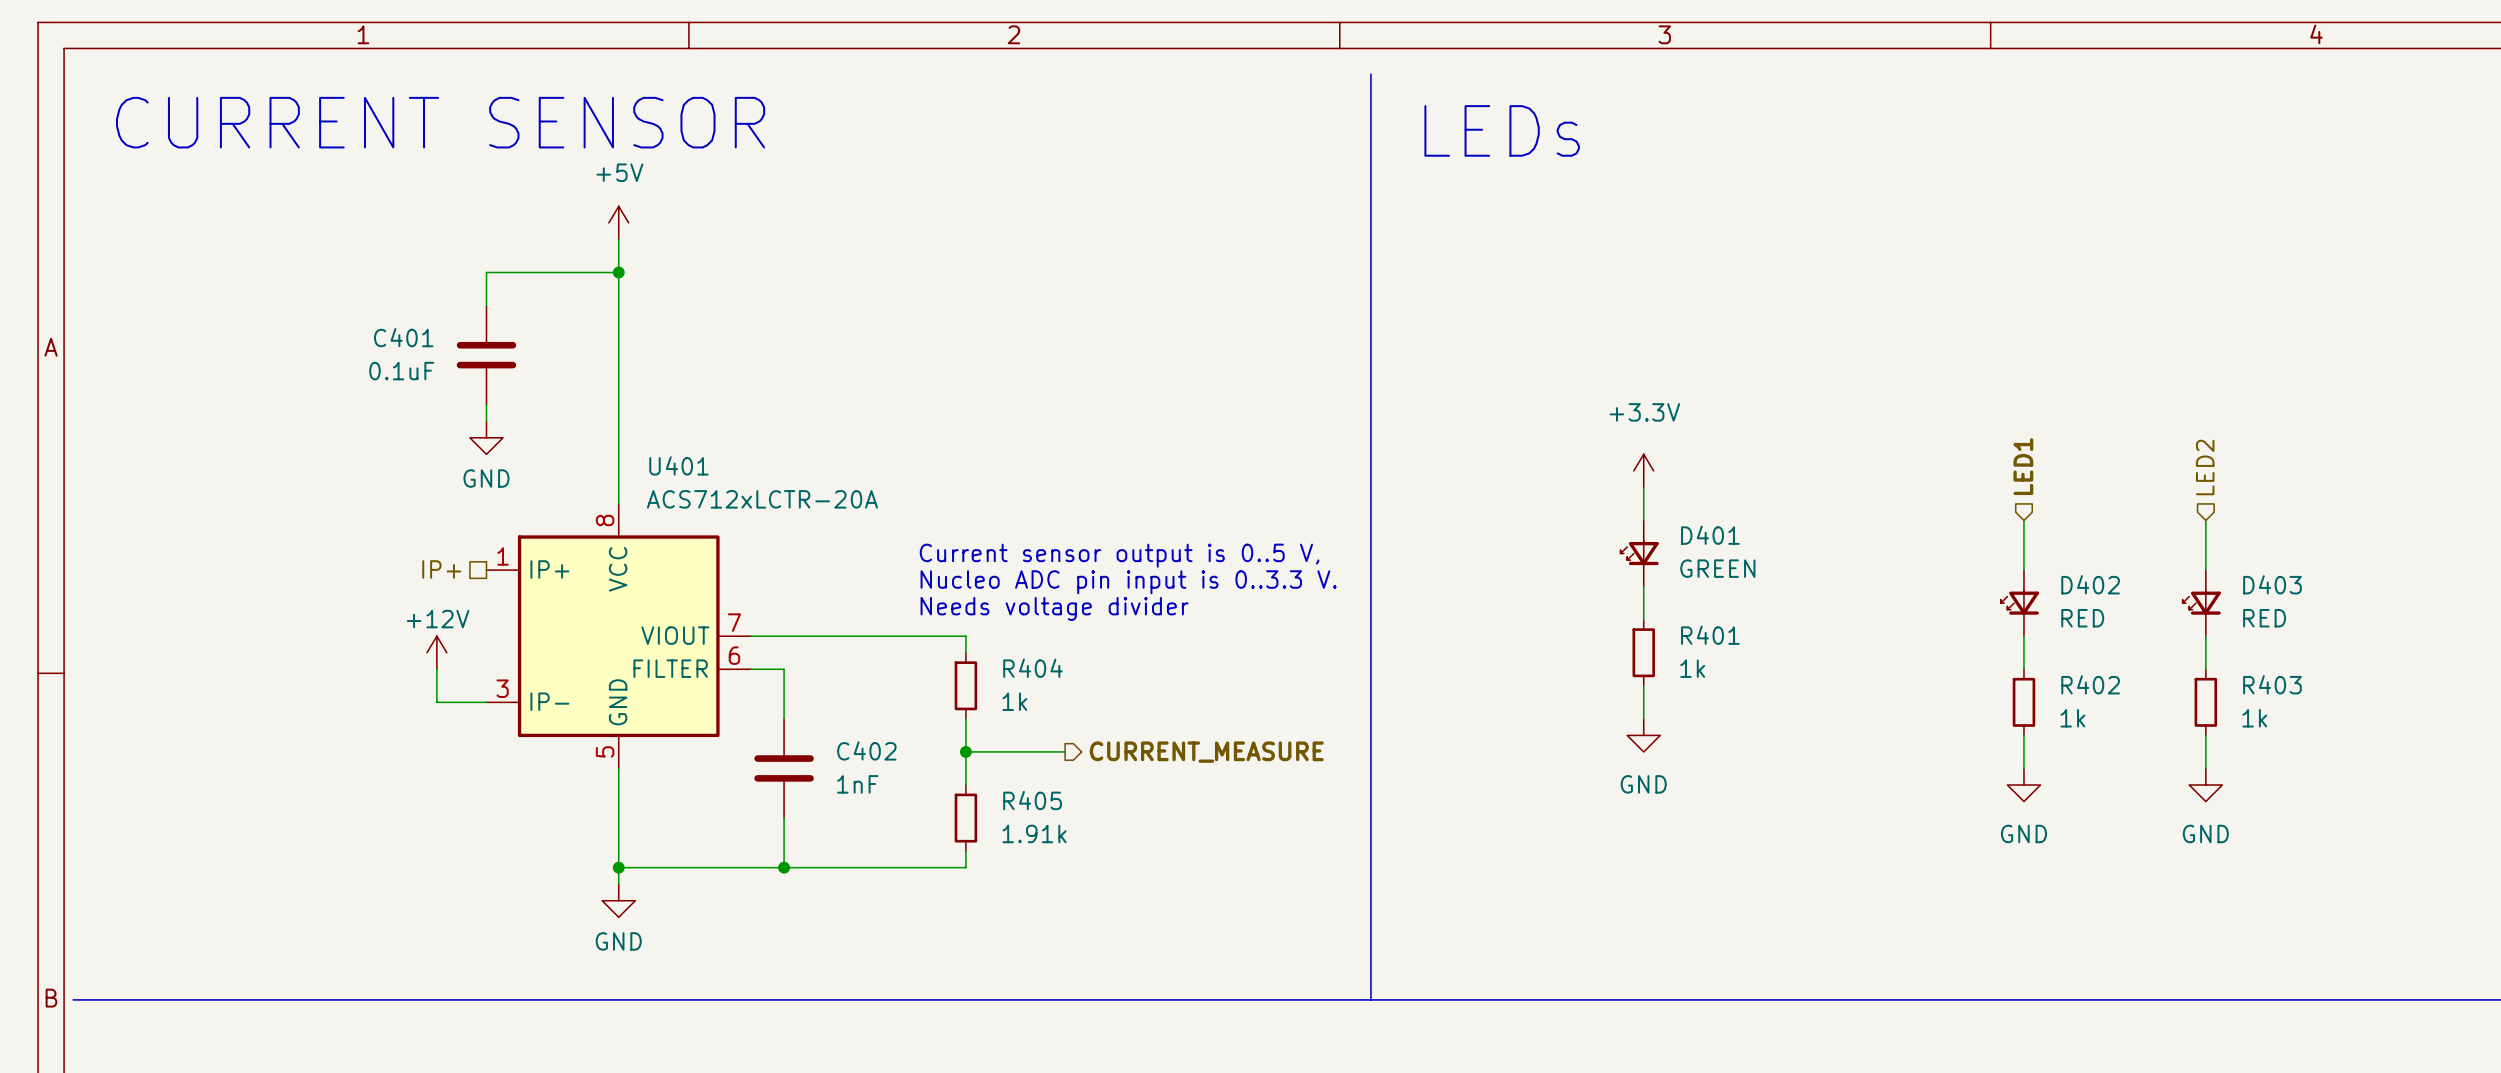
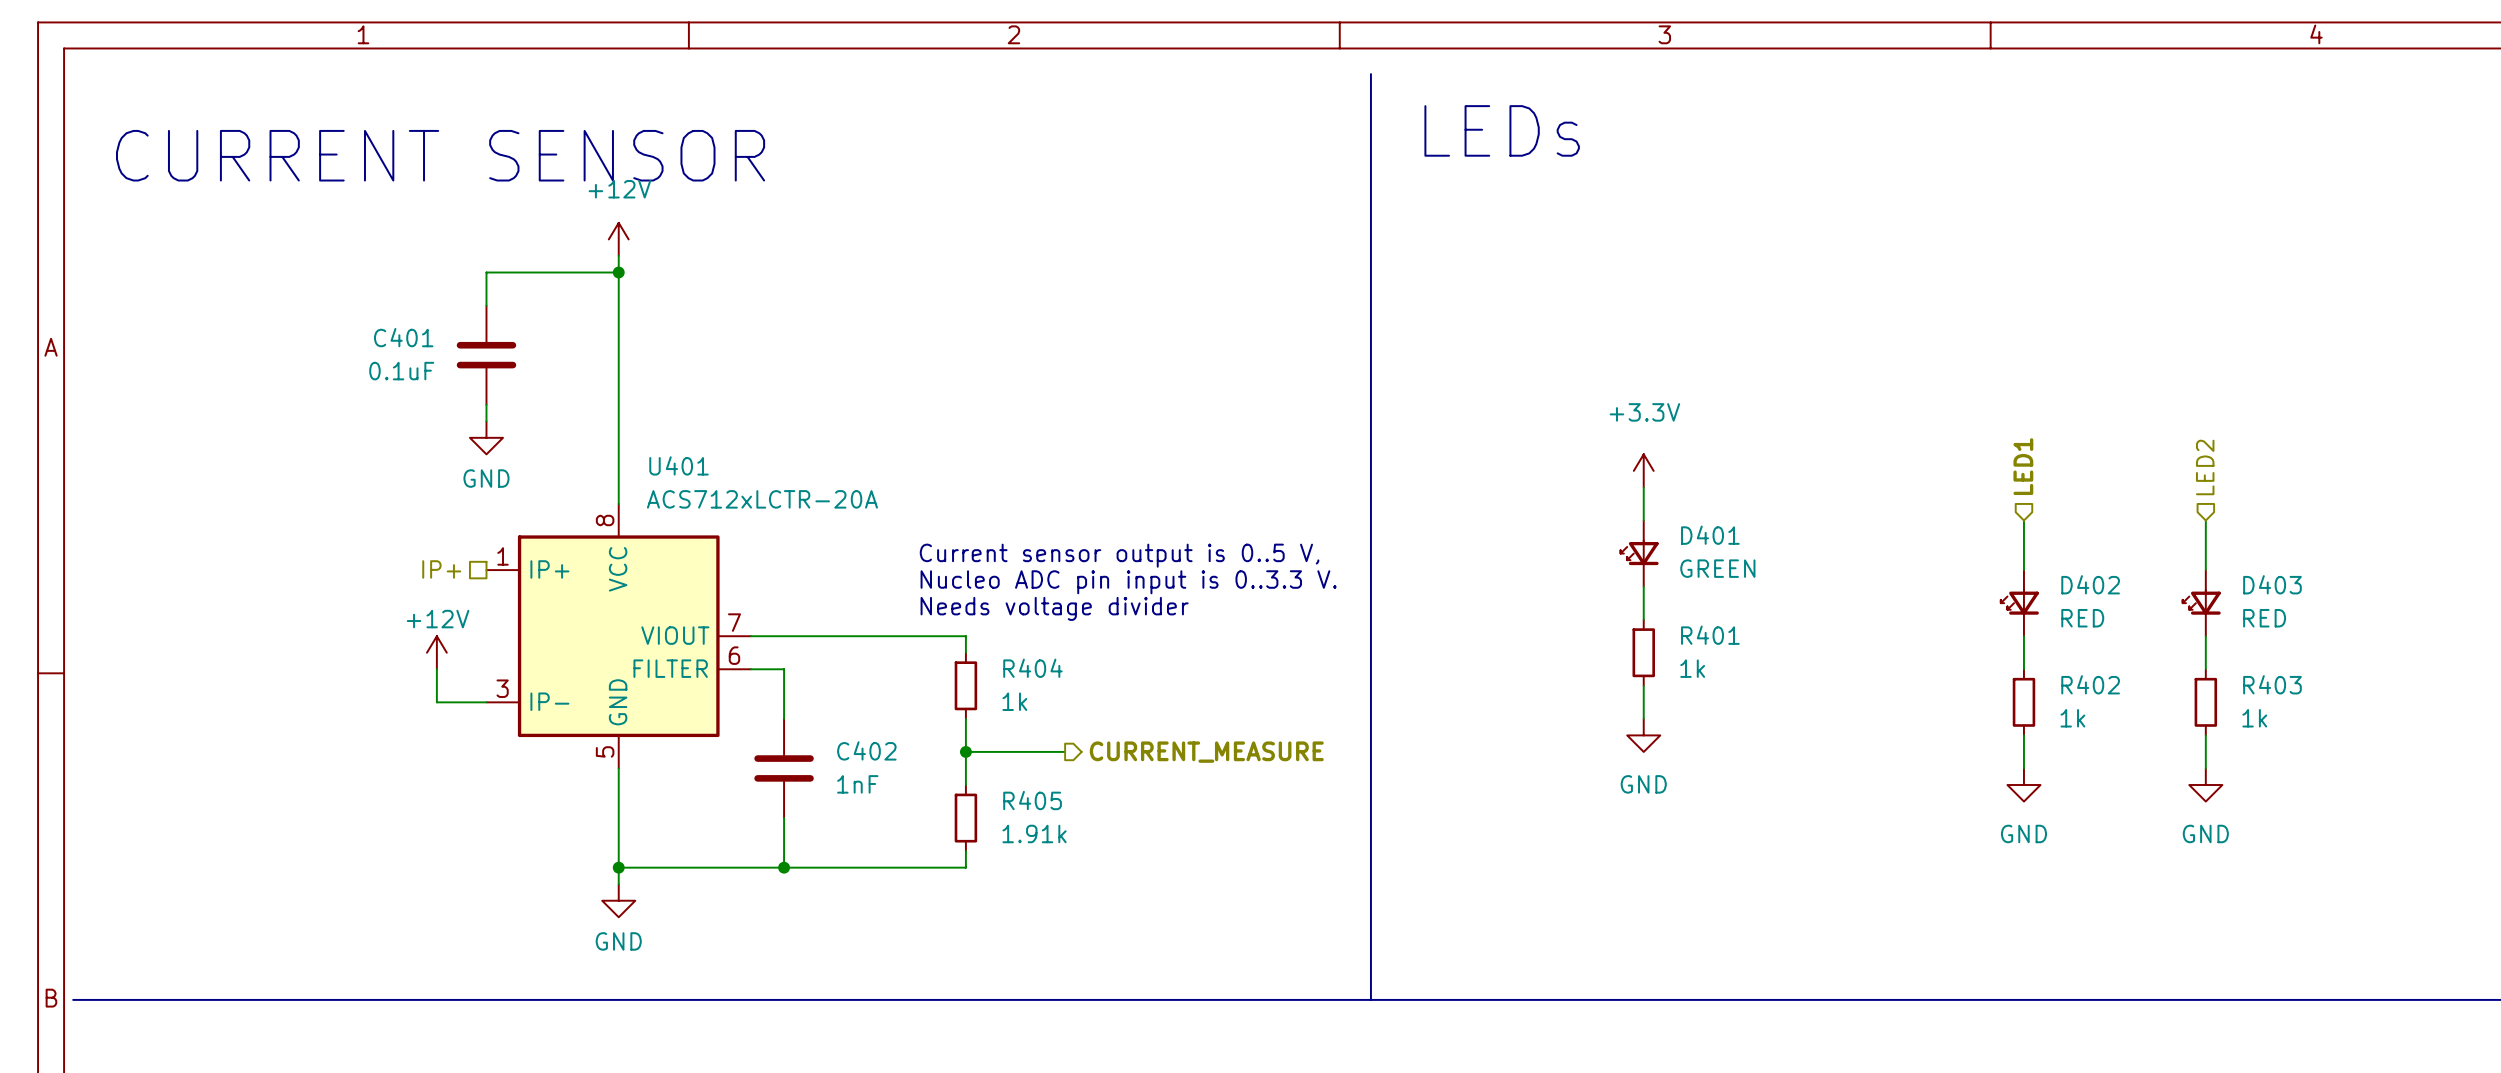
text position: CURRENT SENSOR (440, 122) -> CURRENT SENSOR (440, 155)
power symbol: +5V (618, 222) -> none
power symbol: none -> +12V (618, 239)

